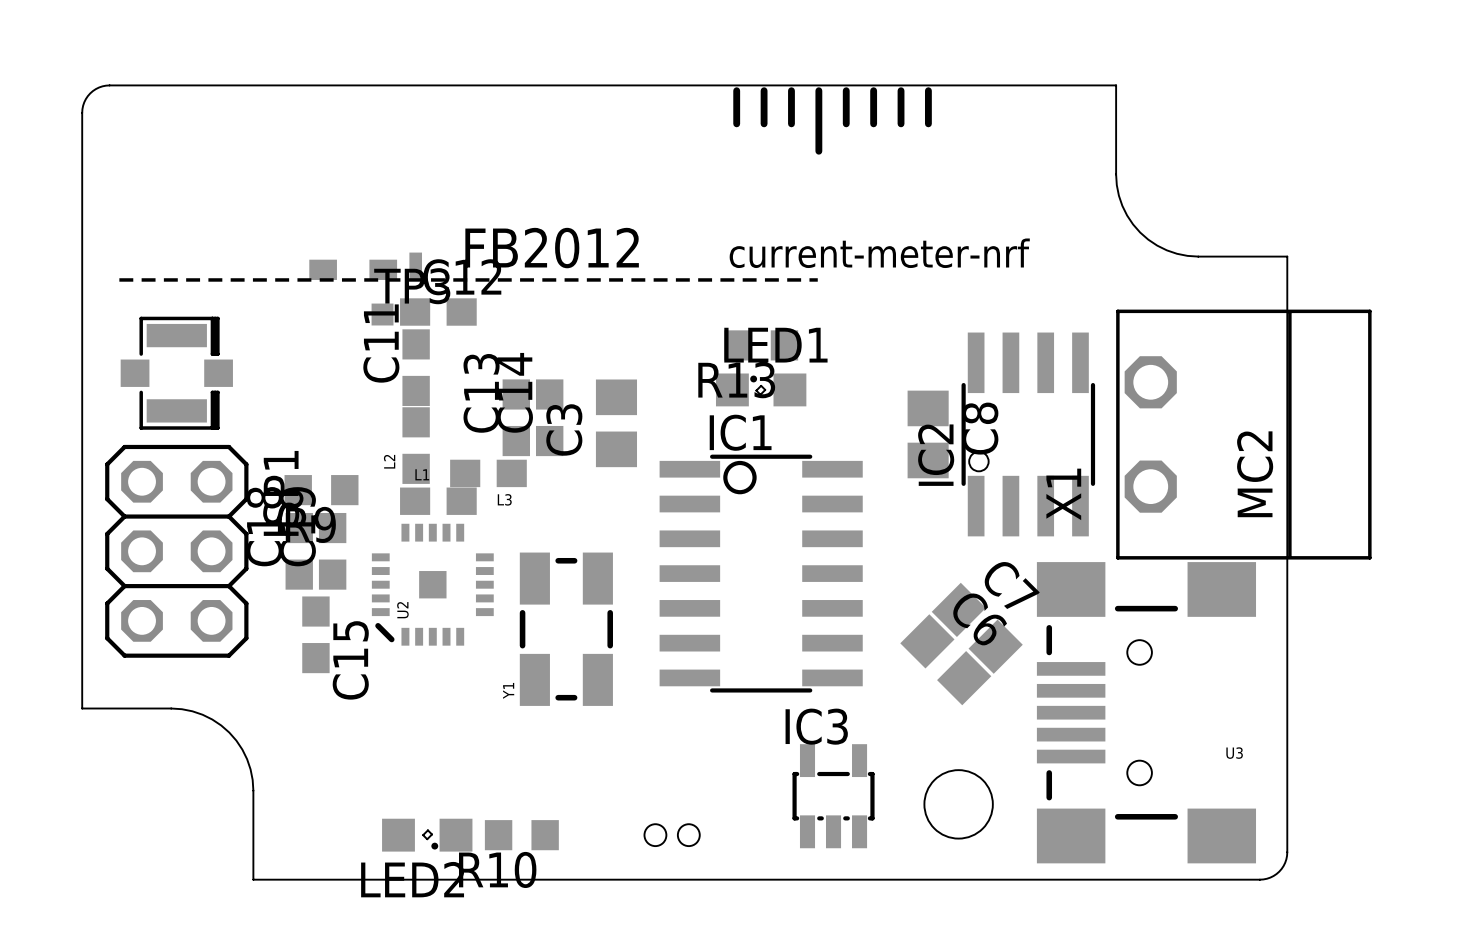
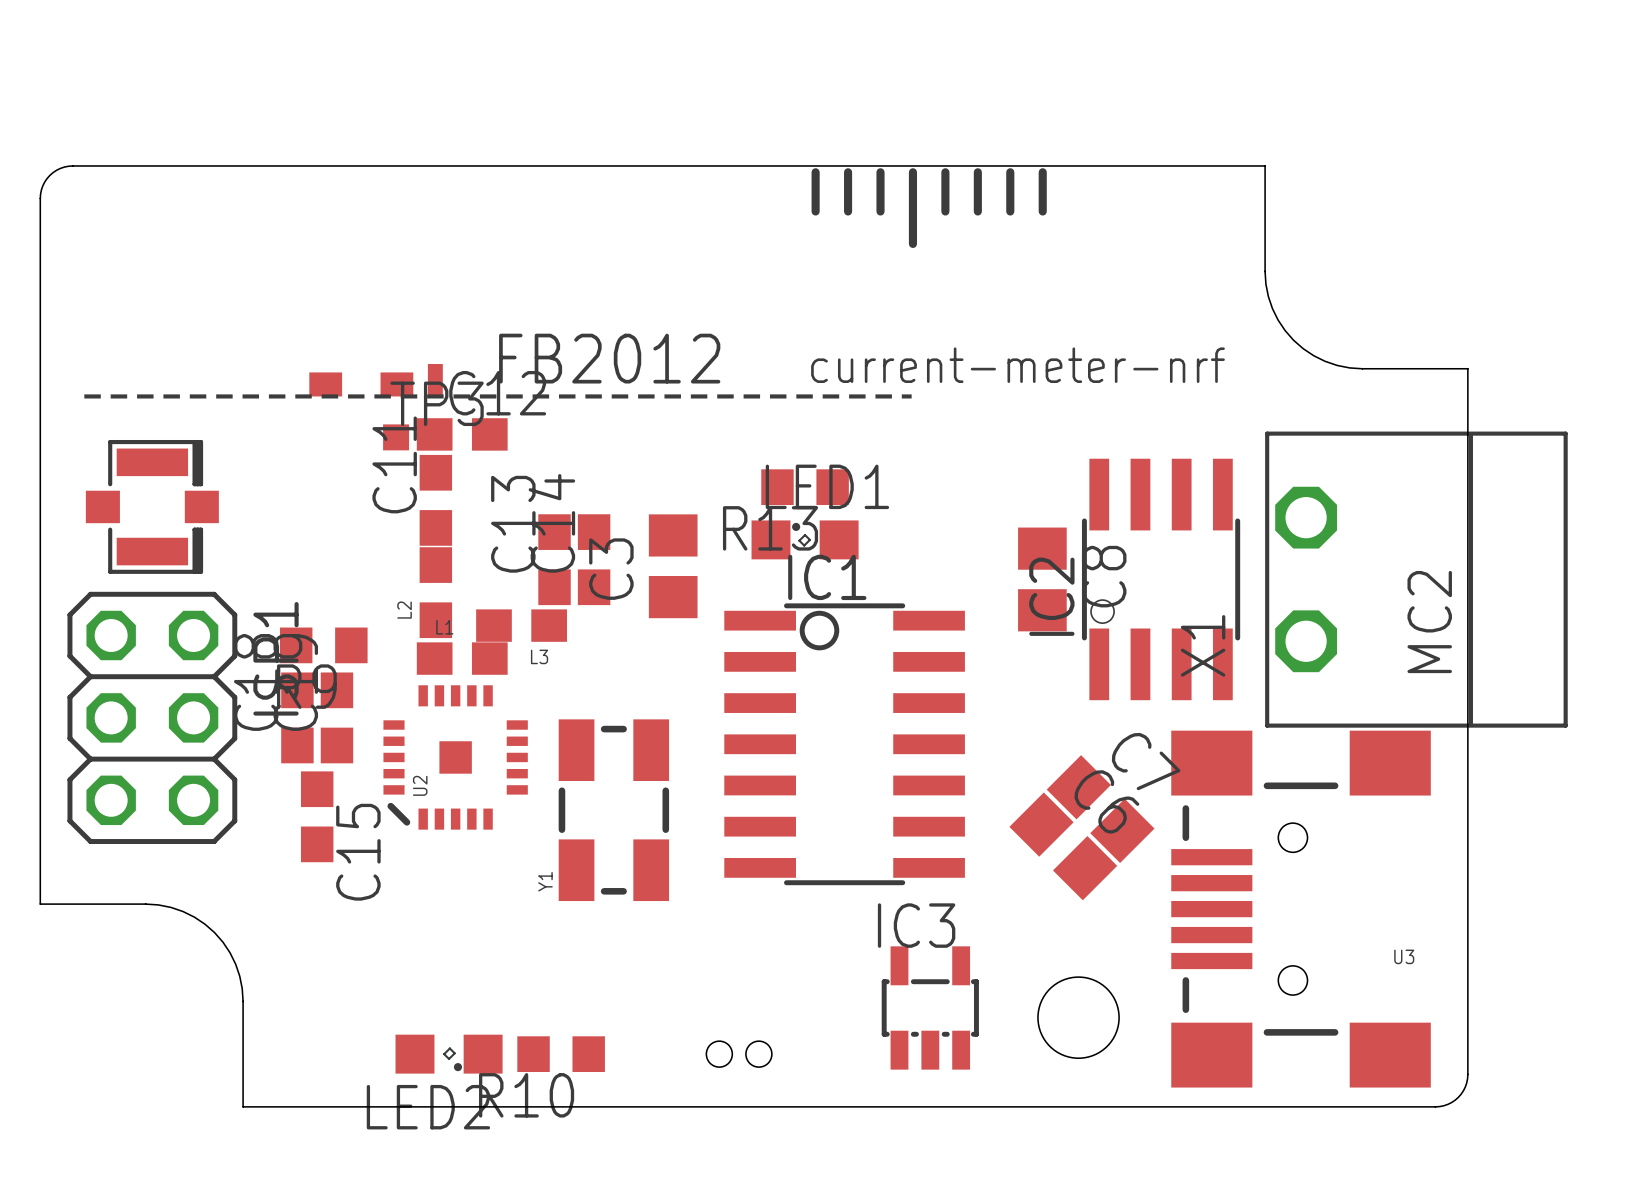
R13 position: (761, 345) -> (805, 487)
LED1 position: (761, 389) -> (805, 539)

